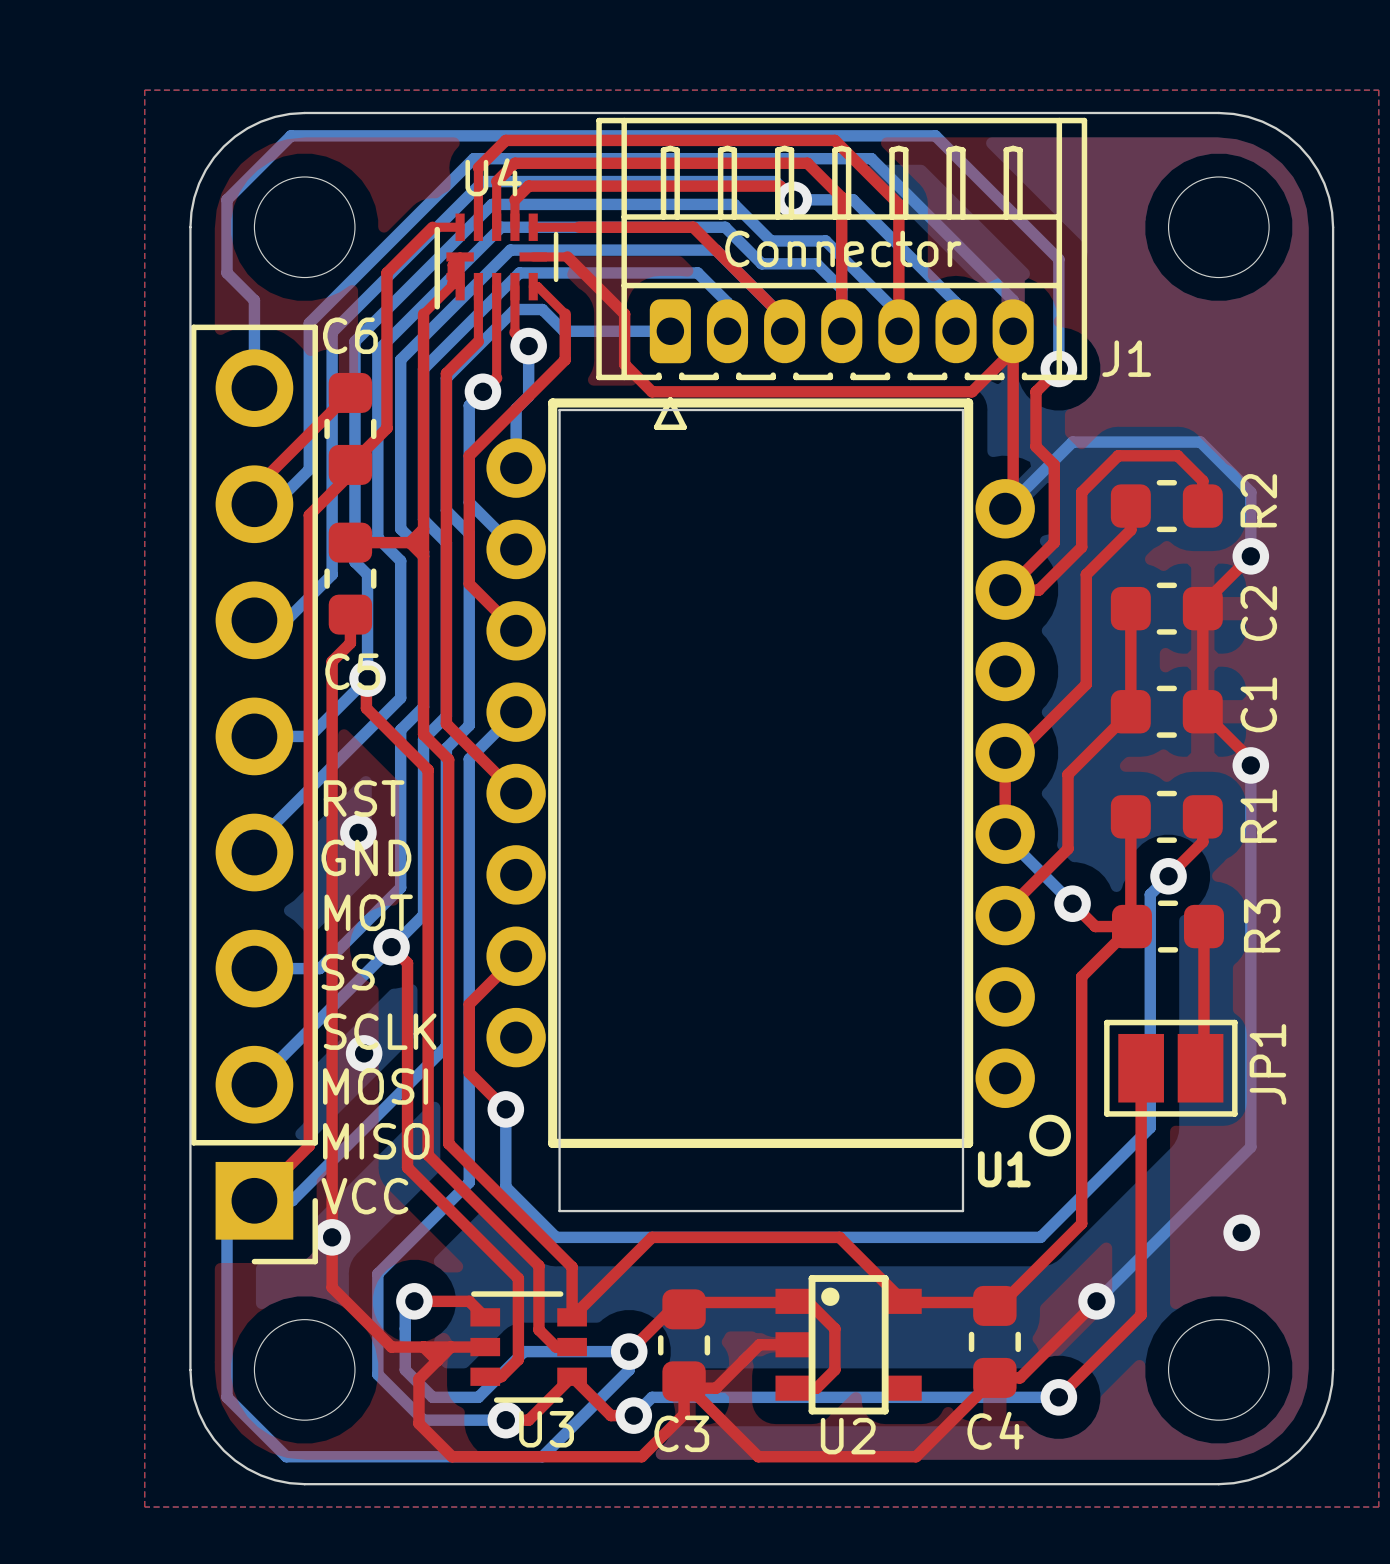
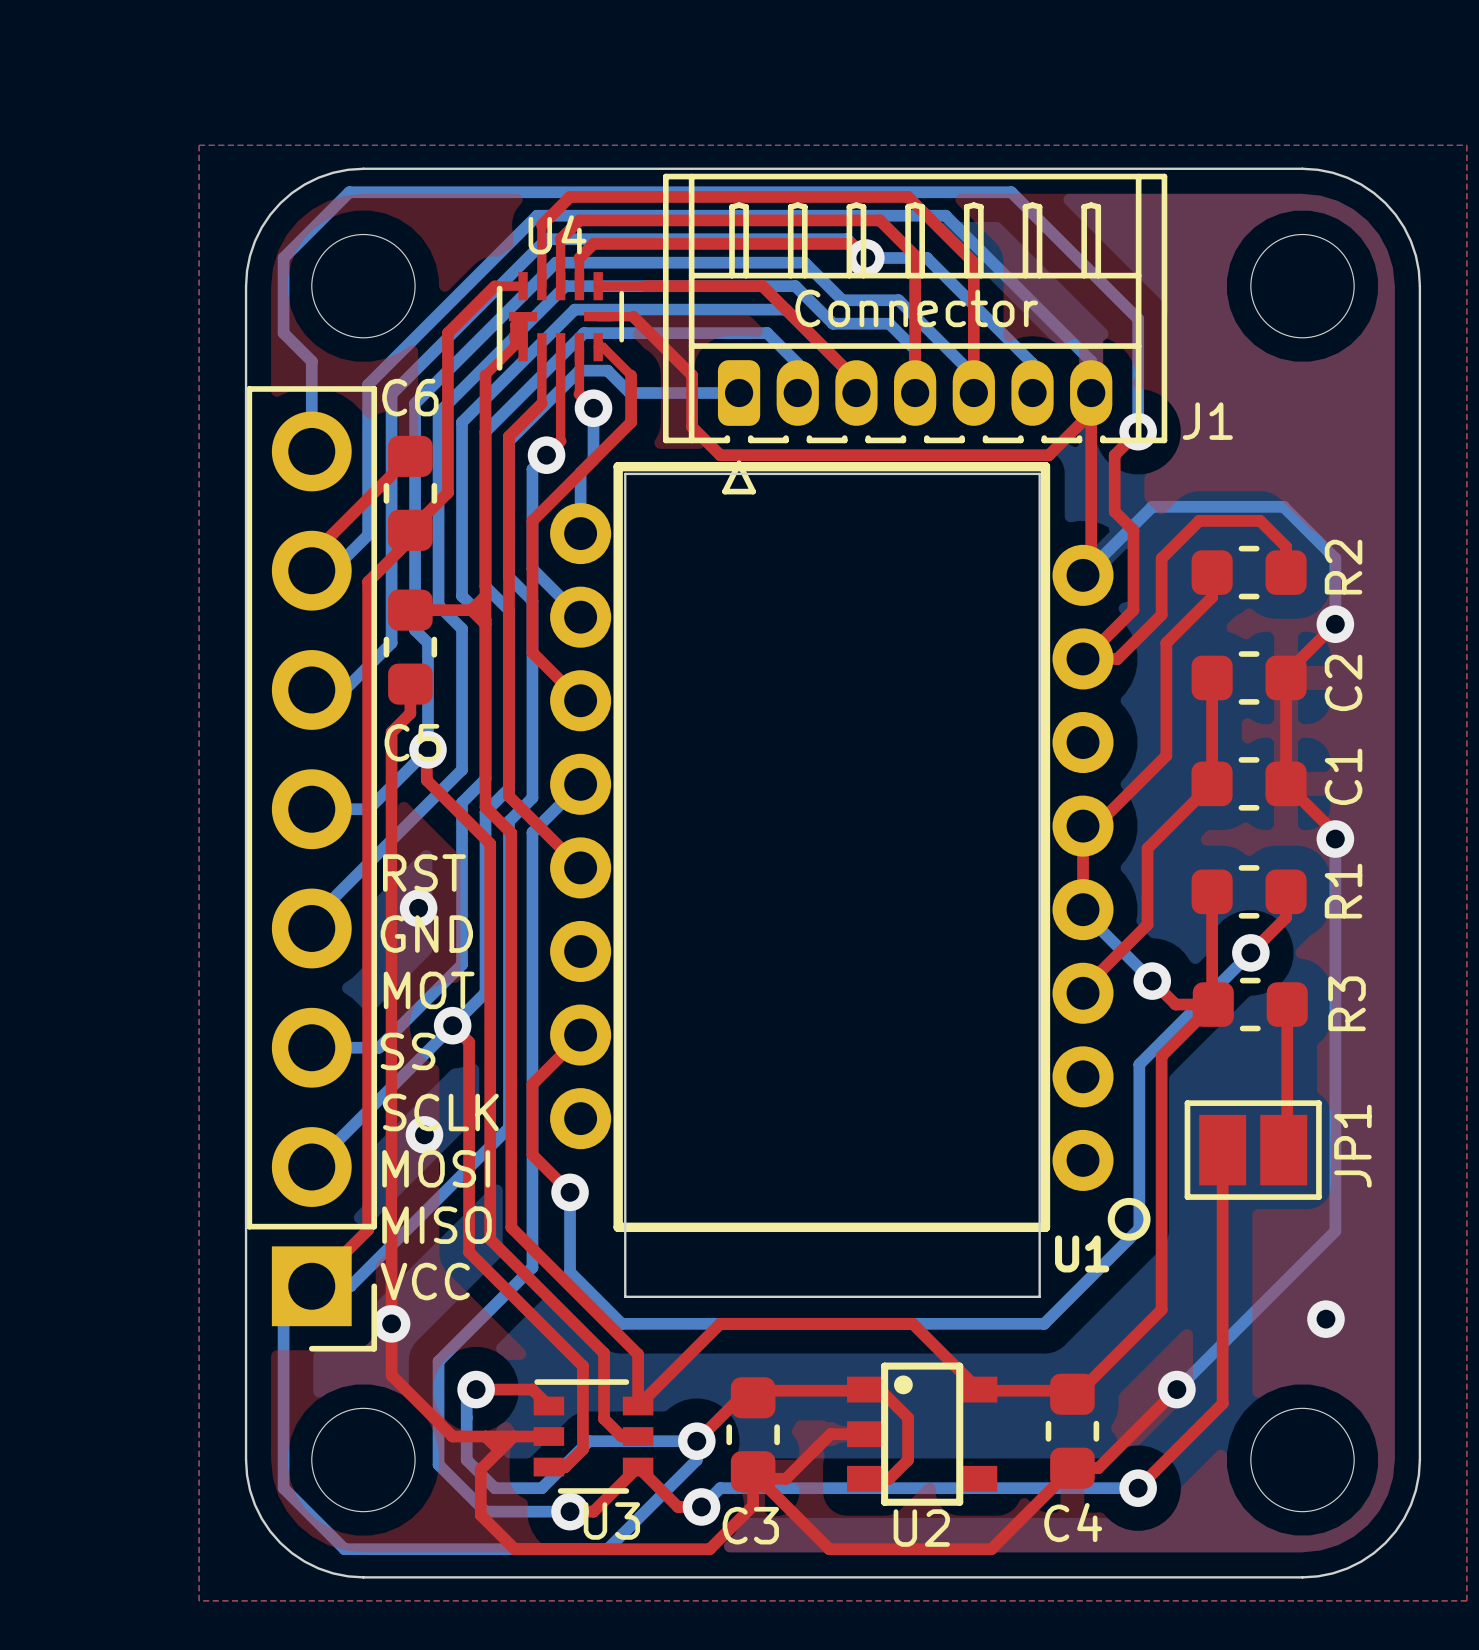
bottom track: (1150, 894) (1150, 1127) (1040, 1237) (967, 1237) -> (1232, 971) (1139, 1064) (1139, 1228) (1044, 1323)

